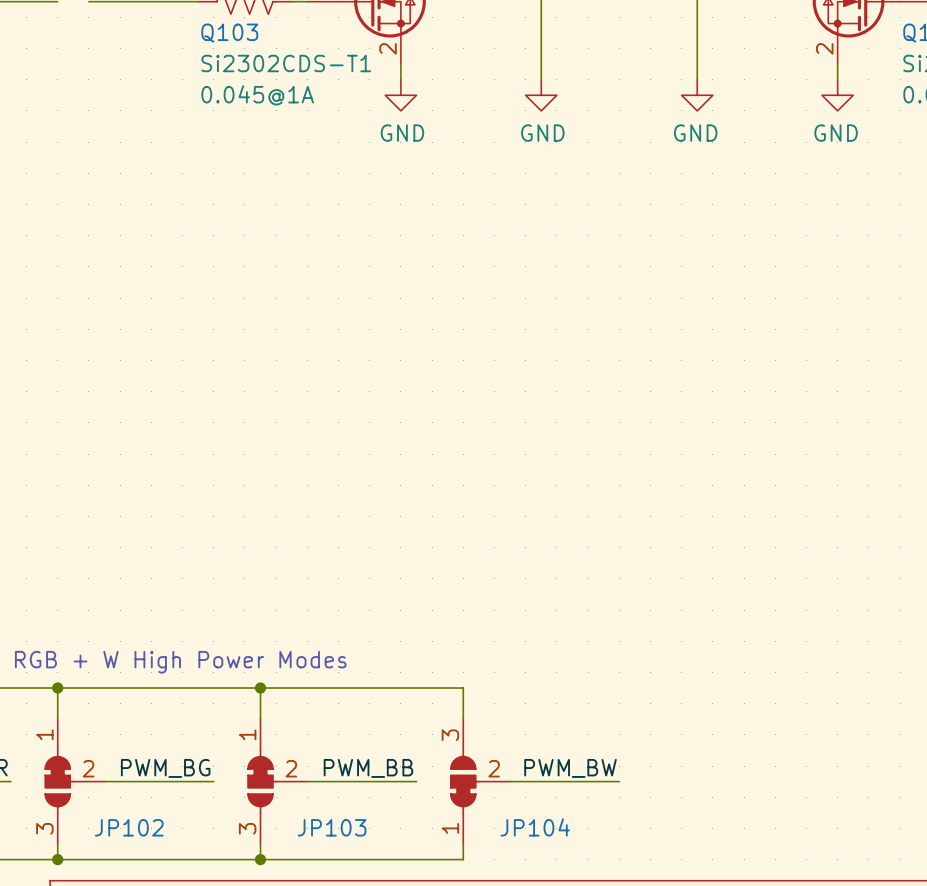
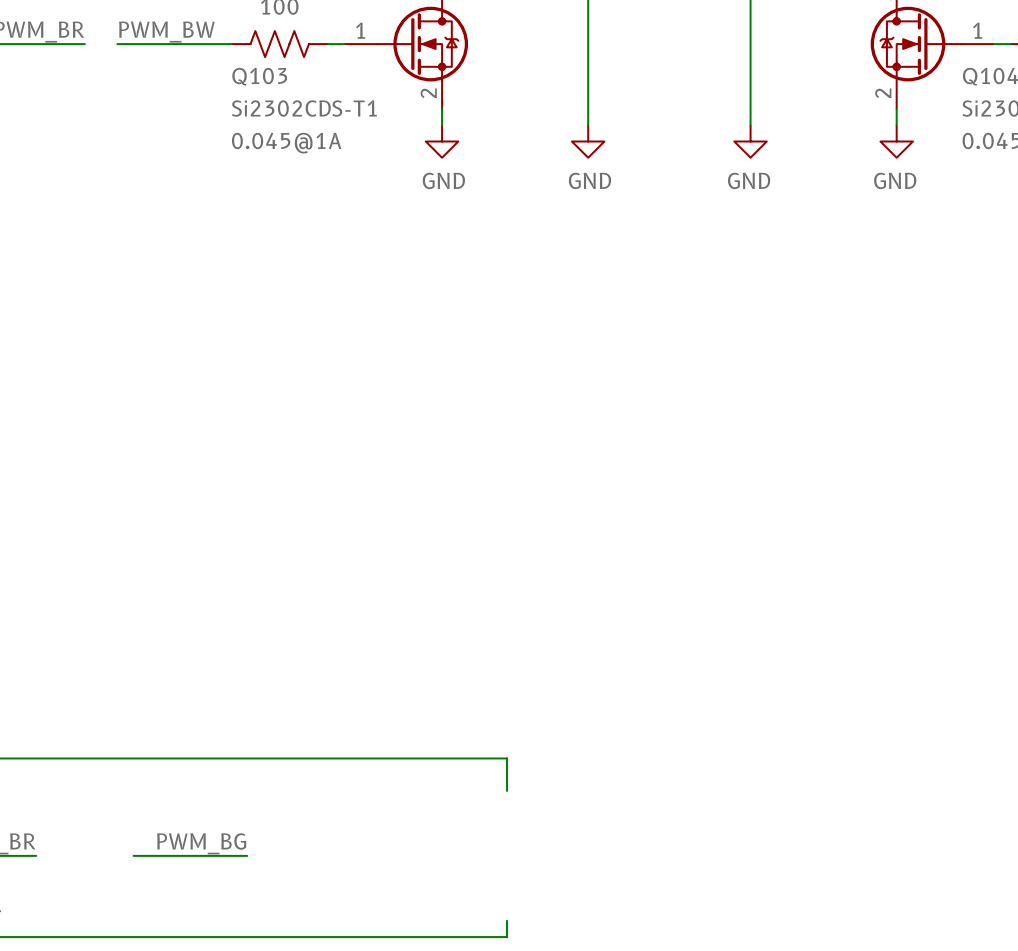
text: RGB + W High Power Modes (180, 662) -> none
wire: (57, 688) (57, 719) -> none
junction: (57, 688) -> none
wire: (260, 688) (260, 719) -> none
junction: (260, 688) -> none
label: PWM_BB (368, 768) -> none
label: PWM_BW (570, 768) -> none
JP102: (74, 781) -> none
JP103: (277, 781) -> none
wire: (307, 781) (416, 781) -> none
JP104: (480, 781) -> none
wire: (510, 781) (619, 781) -> none
wire: (57, 843) (57, 859) -> none
wire: (260, 843) (260, 859) -> none
junction: (57, 859) -> none
junction: (260, 859) -> none

